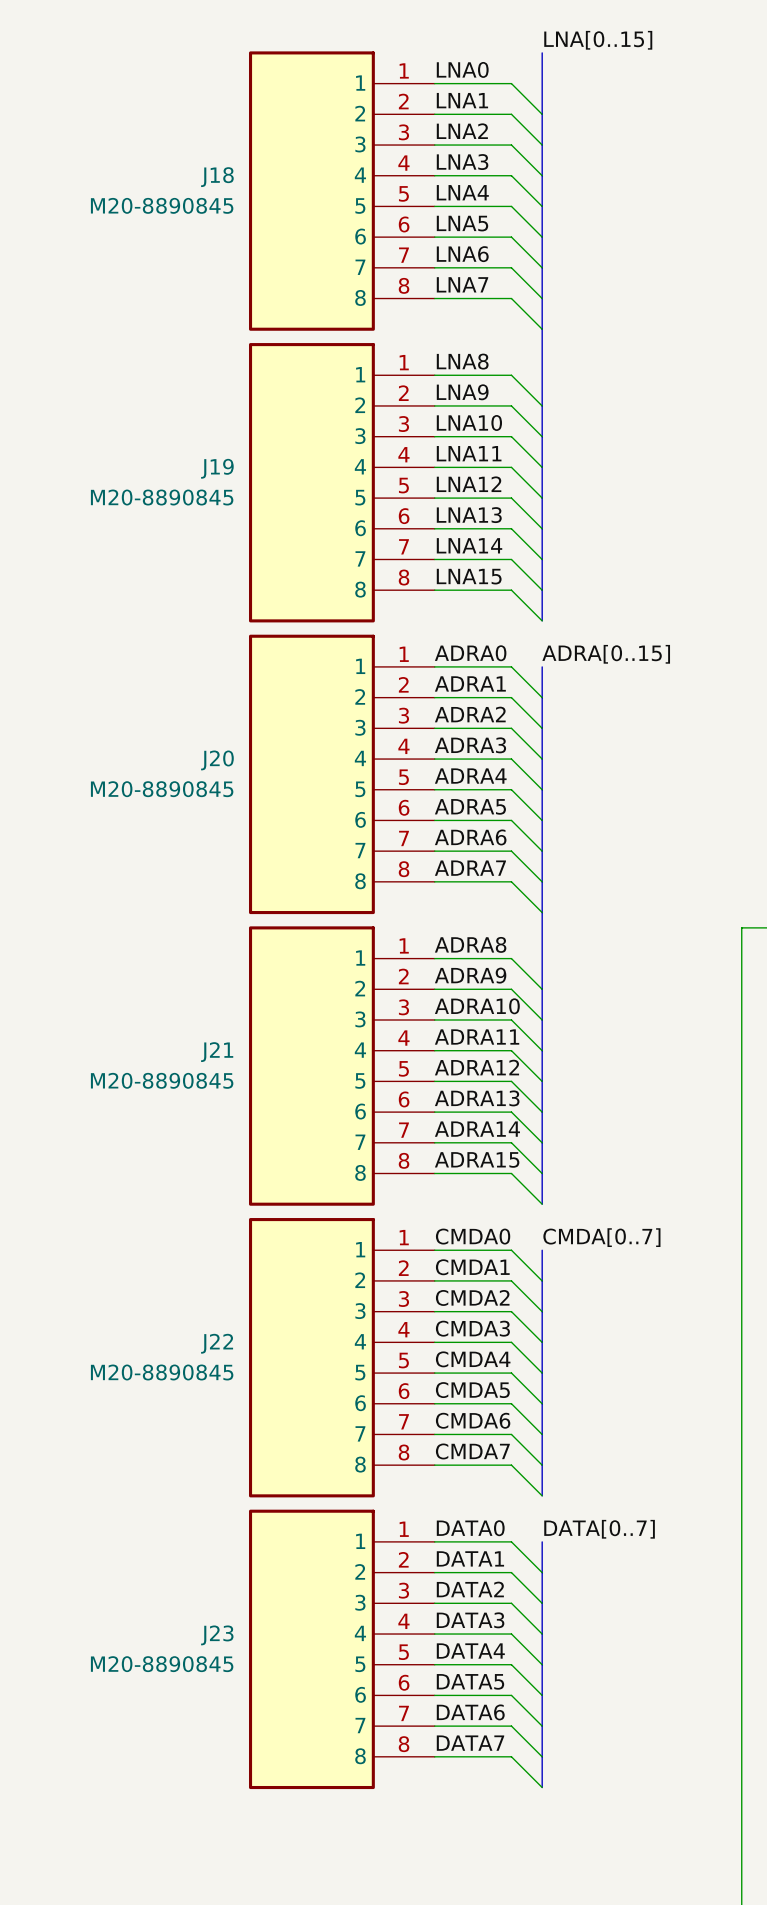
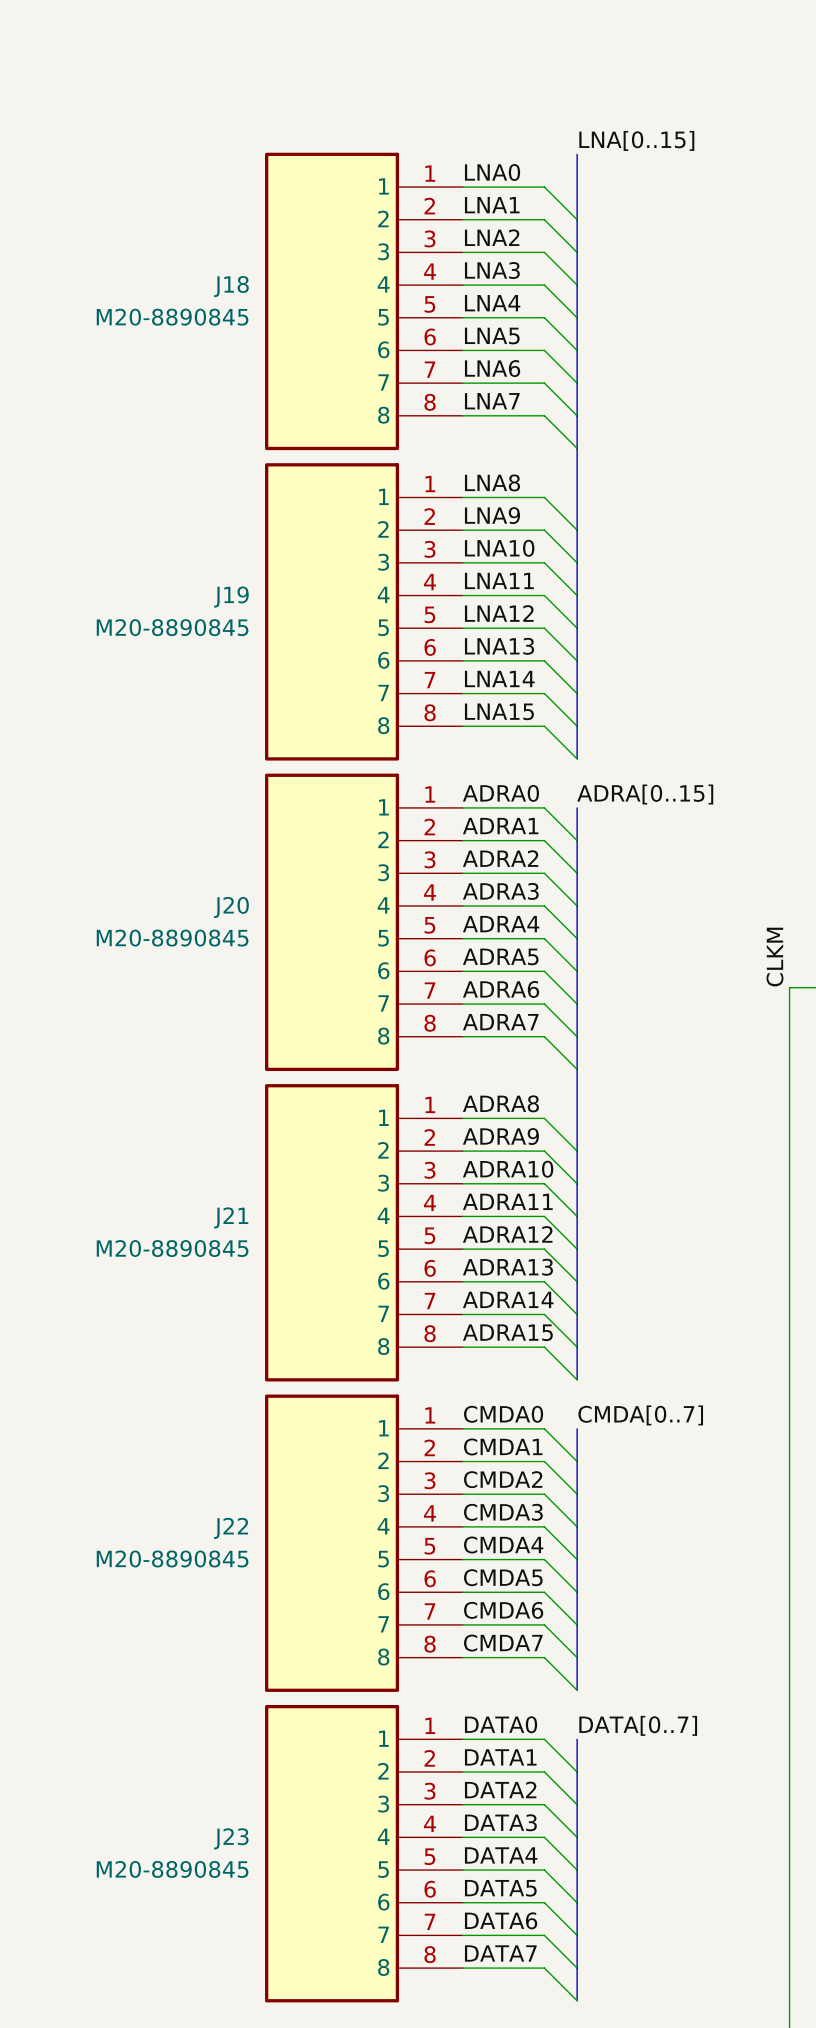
label position: LNA[0..15] (598, 40) -> LNA[0..15] (636, 140)
bus: (542, 52) (542, 145) -> none
label: LNA0 (462, 69) -> none
wire: (434, 83) (511, 83) (542, 114) -> (462, 350) (544, 350) (577, 383)
label: LNA1 (462, 100) -> none
wire: (434, 114) (511, 114) (542, 145) -> (462, 383) (544, 383) (577, 415)
label: LNA2 (462, 131) -> none
wire: (434, 145) (511, 145) (542, 175) -> (462, 415) (544, 415) (577, 448)
label: LNA3 (462, 162) -> LNA0 (492, 172)
J18 position: (341, 191) -> (363, 301)
label: LNA4 (462, 192) -> LNA1 (492, 205)
label: LNA5 (462, 223) -> LNA2 (492, 237)
label: LNA6 (462, 254) -> LNA3 (492, 270)
label: LNA7 (462, 284) -> LNA4 (492, 303)
label: none -> LNA5 (492, 336)
label: none -> LNA6 (492, 368)
label: LNA8 (462, 361) -> none
wire: (434, 375) (511, 375) (542, 405) -> (462, 660) (544, 660) (577, 693)
label: none -> LNA7 (492, 401)
label: LNA9 (462, 392) -> none
wire: (434, 405) (511, 405) (542, 436) -> (462, 693) (544, 693) (577, 726)
label: LNA10 (469, 422) -> none
wire: (434, 436) (511, 436) (542, 467) -> (462, 726) (544, 726) (577, 758)
label: LNA11 (469, 453) -> LNA8 (492, 482)
J19 position: (341, 482) -> (363, 611)
label: LNA12 (469, 484) -> LNA9 (492, 515)
label: LNA13 (469, 515) -> LNA10 (499, 548)
label: LNA14 (469, 545) -> LNA11 (499, 580)
label: LNA15 (469, 576) -> LNA12 (499, 613)
label: none -> LNA13 (499, 646)
label: none -> LNA14 (499, 679)
label: ADRA0 (470, 653) -> none
label position: ADRA[0..15] (606, 654) -> ADRA[0..15] (645, 794)
wire: (434, 666) (511, 666) (542, 697) -> (462, 971) (544, 971) (577, 1004)
label: none -> LNA15 (499, 711)
label: ADRA1 (470, 683) -> none
wire: (434, 697) (511, 697) (542, 728) -> (462, 1004) (544, 1004) (577, 1036)
bus: (542, 712) (542, 759) -> (577, 660) (577, 709)
label: ADRA2 (470, 714) -> none
wire: (434, 728) (511, 728) (542, 759) -> (462, 1036) (544, 1036) (577, 1069)
label: ADRA3 (470, 745) -> ADRA0 (500, 793)
J20 position: (341, 774) -> (363, 922)
label: ADRA4 (470, 776) -> ADRA1 (500, 826)
label: ADRA5 (470, 806) -> ADRA2 (500, 858)
label: ADRA6 (470, 837) -> ADRA3 (500, 891)
label: ADRA7 (470, 868) -> ADRA4 (501, 924)
label: none -> ADRA5 (500, 956)
label: none -> CLKM (774, 957)
label: none -> ADRA6 (501, 989)
label: ADRA8 (470, 944) -> none
wire: (434, 958) (511, 958) (542, 989) -> (462, 1281) (544, 1281) (577, 1314)
label: none -> ADRA7 (500, 1022)
label: ADRA9 (470, 975) -> none
wire: (434, 989) (511, 989) (542, 1019) -> (462, 1314) (544, 1314) (577, 1347)
label: ADRA10 (477, 1006) -> none
wire: (434, 1019) (511, 1019) (542, 1050) -> (462, 1347) (544, 1347) (577, 1379)
label: ADRA11 (477, 1037) -> ADRA8 (500, 1103)
J21 position: (341, 1066) -> (363, 1232)
label: ADRA12 (476, 1067) -> ADRA9 (500, 1136)
label: ADRA13 (477, 1098) -> ADRA10 (508, 1169)
label: ADRA14 (477, 1129) -> ADRA11 (507, 1201)
label: ADRA15 (477, 1159) -> ADRA12 (507, 1234)
label: none -> ADRA13 (507, 1267)
label: none -> ADRA14 (508, 1299)
label: CMDA0 (473, 1236) -> none
label position: CMDA[0..7] (601, 1237) -> CMDA[0..7] (640, 1415)
wire: (434, 1250) (511, 1250) (542, 1280) -> (462, 1592) (544, 1592) (577, 1624)
label: none -> ADRA15 (507, 1332)
label: CMDA1 (472, 1267) -> none
wire: (434, 1280) (511, 1280) (542, 1311) -> (462, 1624) (544, 1624) (577, 1657)
bus: (542, 1296) (542, 1342) -> (577, 1281) (577, 1330)
label: CMDA2 (472, 1297) -> none
wire: (434, 1311) (511, 1311) (542, 1342) -> (462, 1657) (544, 1657) (577, 1690)
label: CMDA3 (472, 1328) -> CMDA0 (503, 1414)
J22 position: (341, 1357) -> (363, 1543)
label: CMDA4 (473, 1359) -> CMDA1 (503, 1446)
label: CMDA5 (472, 1390) -> CMDA2 (503, 1479)
label: CMDA6 (473, 1420) -> CMDA3 (503, 1512)
label: CMDA7 (472, 1451) -> CMDA4 (503, 1545)
label: none -> CMDA5 (503, 1577)
label: none -> CMDA6 (503, 1610)
label: DATA0 (470, 1528) -> none
label position: DATA[0..7] (599, 1529) -> DATA[0..7] (638, 1725)
wire: (434, 1541) (511, 1541) (542, 1572) -> (462, 1902) (544, 1902) (577, 1935)
label: none -> CMDA7 (503, 1643)
label: DATA1 (470, 1558) -> none
wire: (434, 1572) (511, 1572) (542, 1603) -> (462, 1935) (544, 1935) (577, 1968)
bus: (542, 1587) (542, 1634) -> (577, 1592) (577, 1641)
label: DATA2 (470, 1589) -> none
wire: (434, 1603) (511, 1603) (542, 1634) -> (462, 1968) (544, 1968) (577, 2000)
label: DATA3 (470, 1620) -> DATA0 (501, 1724)
J23 position: (341, 1649) -> (363, 1853)
label: DATA4 (470, 1651) -> DATA1 (500, 1757)
label: DATA5 (470, 1681) -> DATA2 (500, 1789)
label: DATA6 (470, 1712) -> DATA3 (500, 1822)
label: DATA7 (470, 1743) -> DATA4 (501, 1855)
label: none -> DATA5 (500, 1888)
bus: none -> (577, 1902) (577, 2000)
label: none -> DATA6 (501, 1920)
label: none -> DATA7 (500, 1953)

